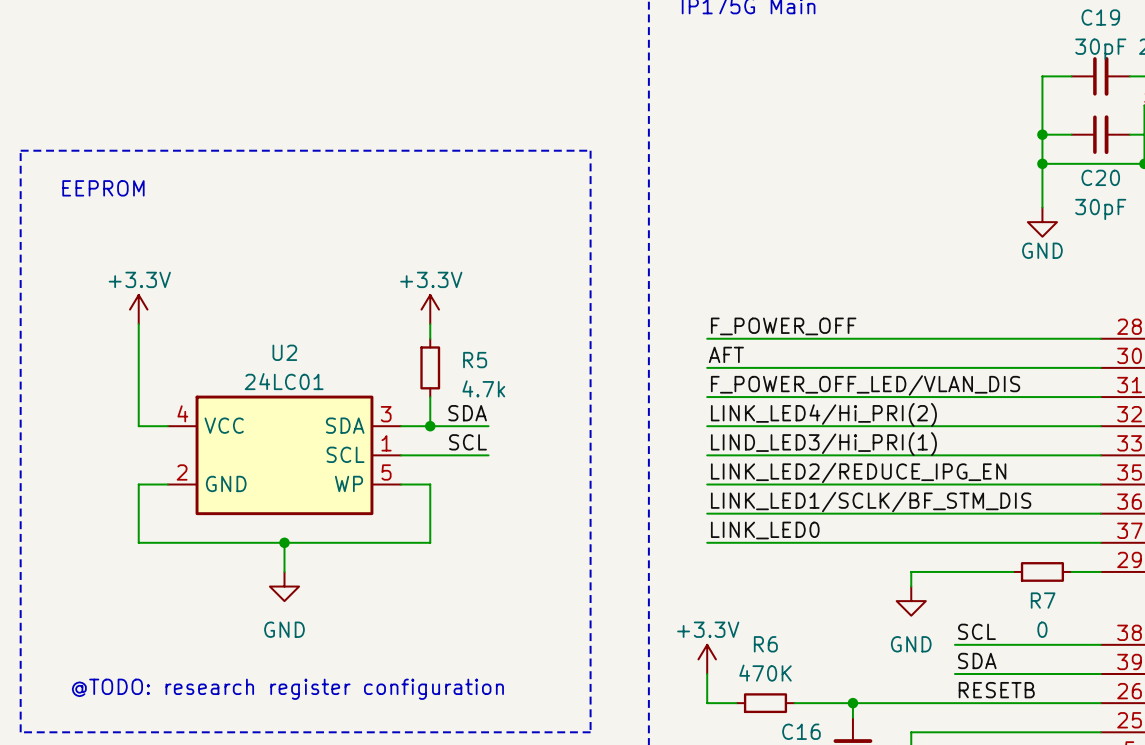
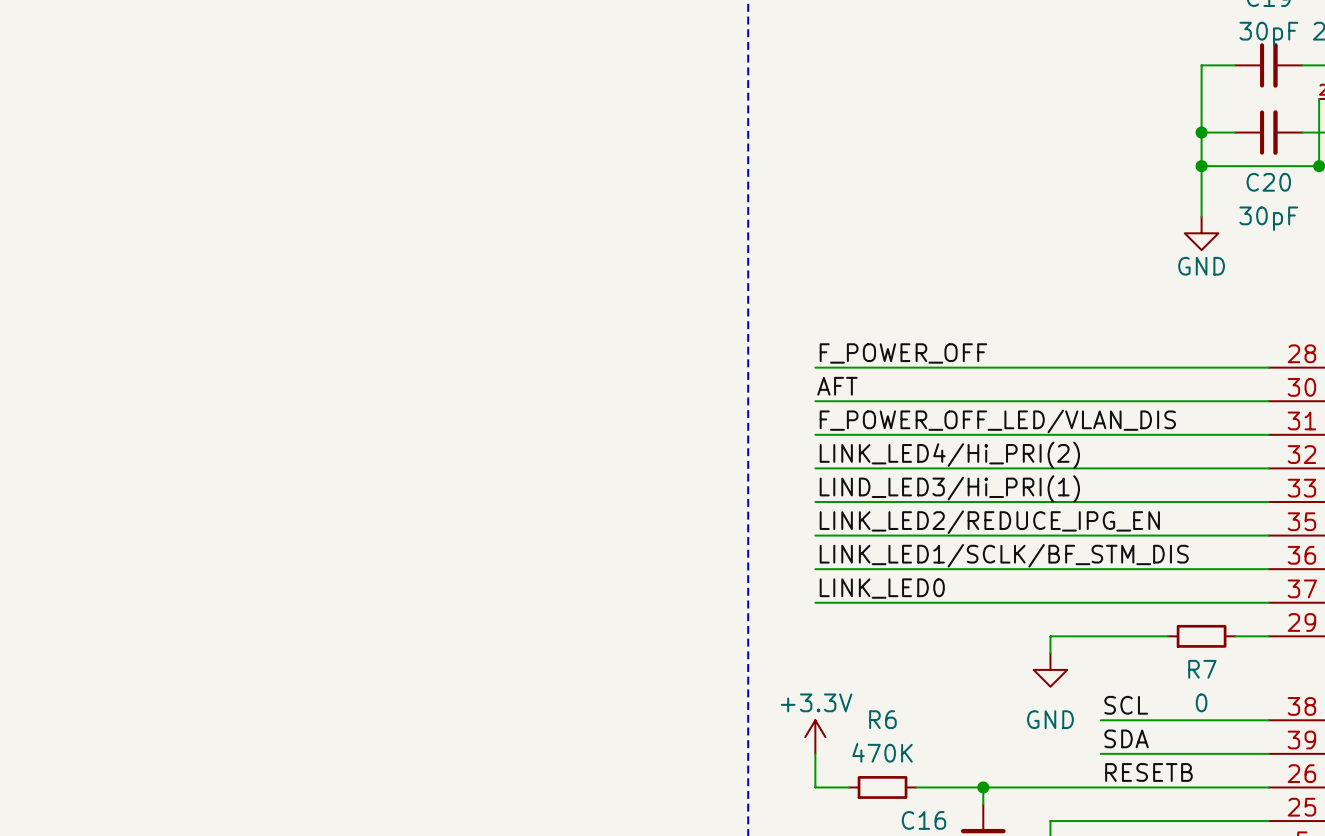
line: (20, 150) (590, 150) (590, 732) (20, 732) (20, 150) -> none
text: EEPROM (103, 188) -> none
power symbol: +3.3V (138, 309) -> none
power symbol: +3.3V (430, 309) -> none
wire: (138, 324) (138, 426) (167, 426) -> none
wire: (430, 324) (430, 338) -> none
R5: 4.7k (430, 367) -> none
wire: (430, 397) (430, 426) -> none
label: SDA (467, 413) -> none
wire: (401, 426) (488, 426) -> none
junction: (430, 426) -> none
label: SCL (467, 442) -> none
U2: 24LC01 (284, 455) -> none
wire: (401, 455) (488, 455) -> none
wire: (167, 484) (138, 484) (138, 542) (430, 542) (430, 484) (401, 484) -> none
wire: (284, 542) (284, 571) -> none
junction: (284, 542) -> none
power symbol: GND (284, 586) -> none
text: @TODO: research register configuration (287, 689) -> none

